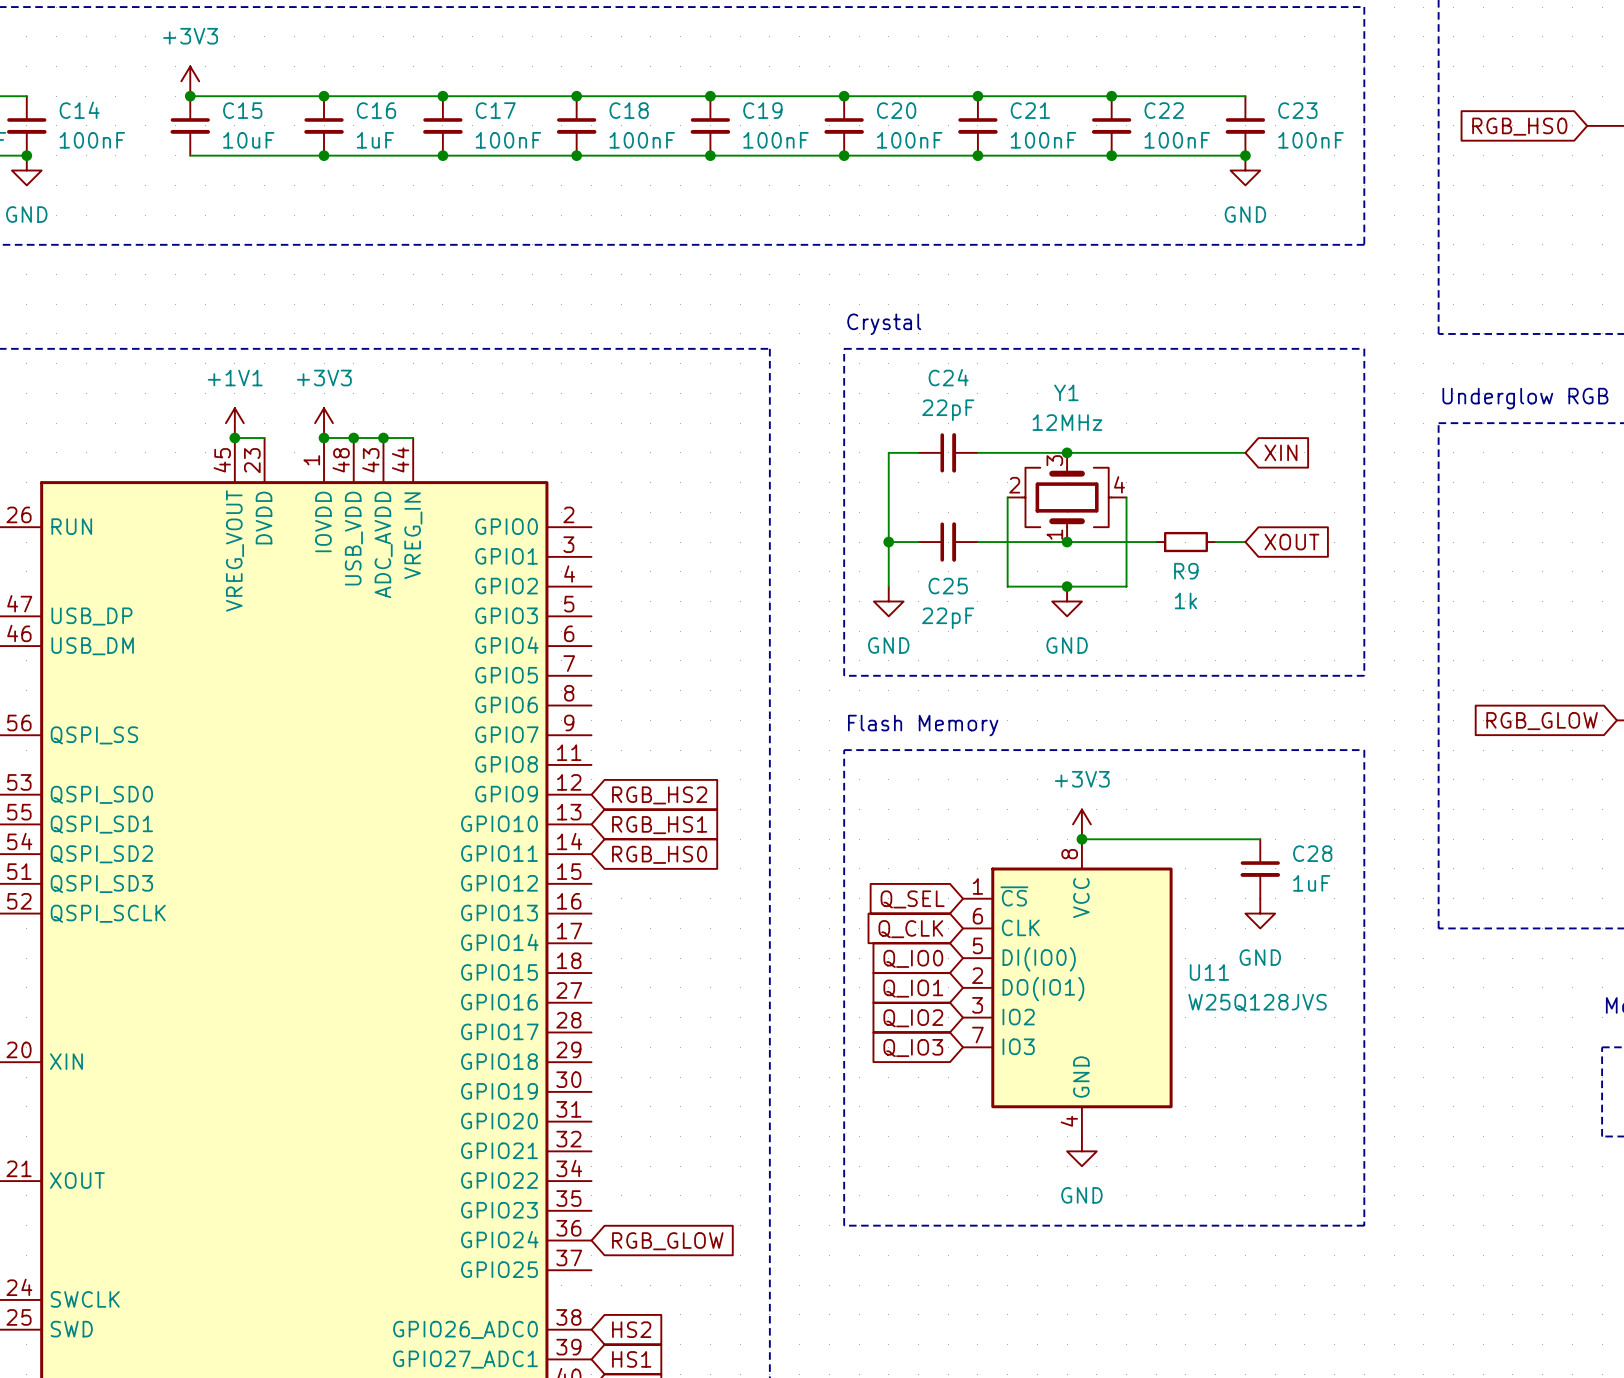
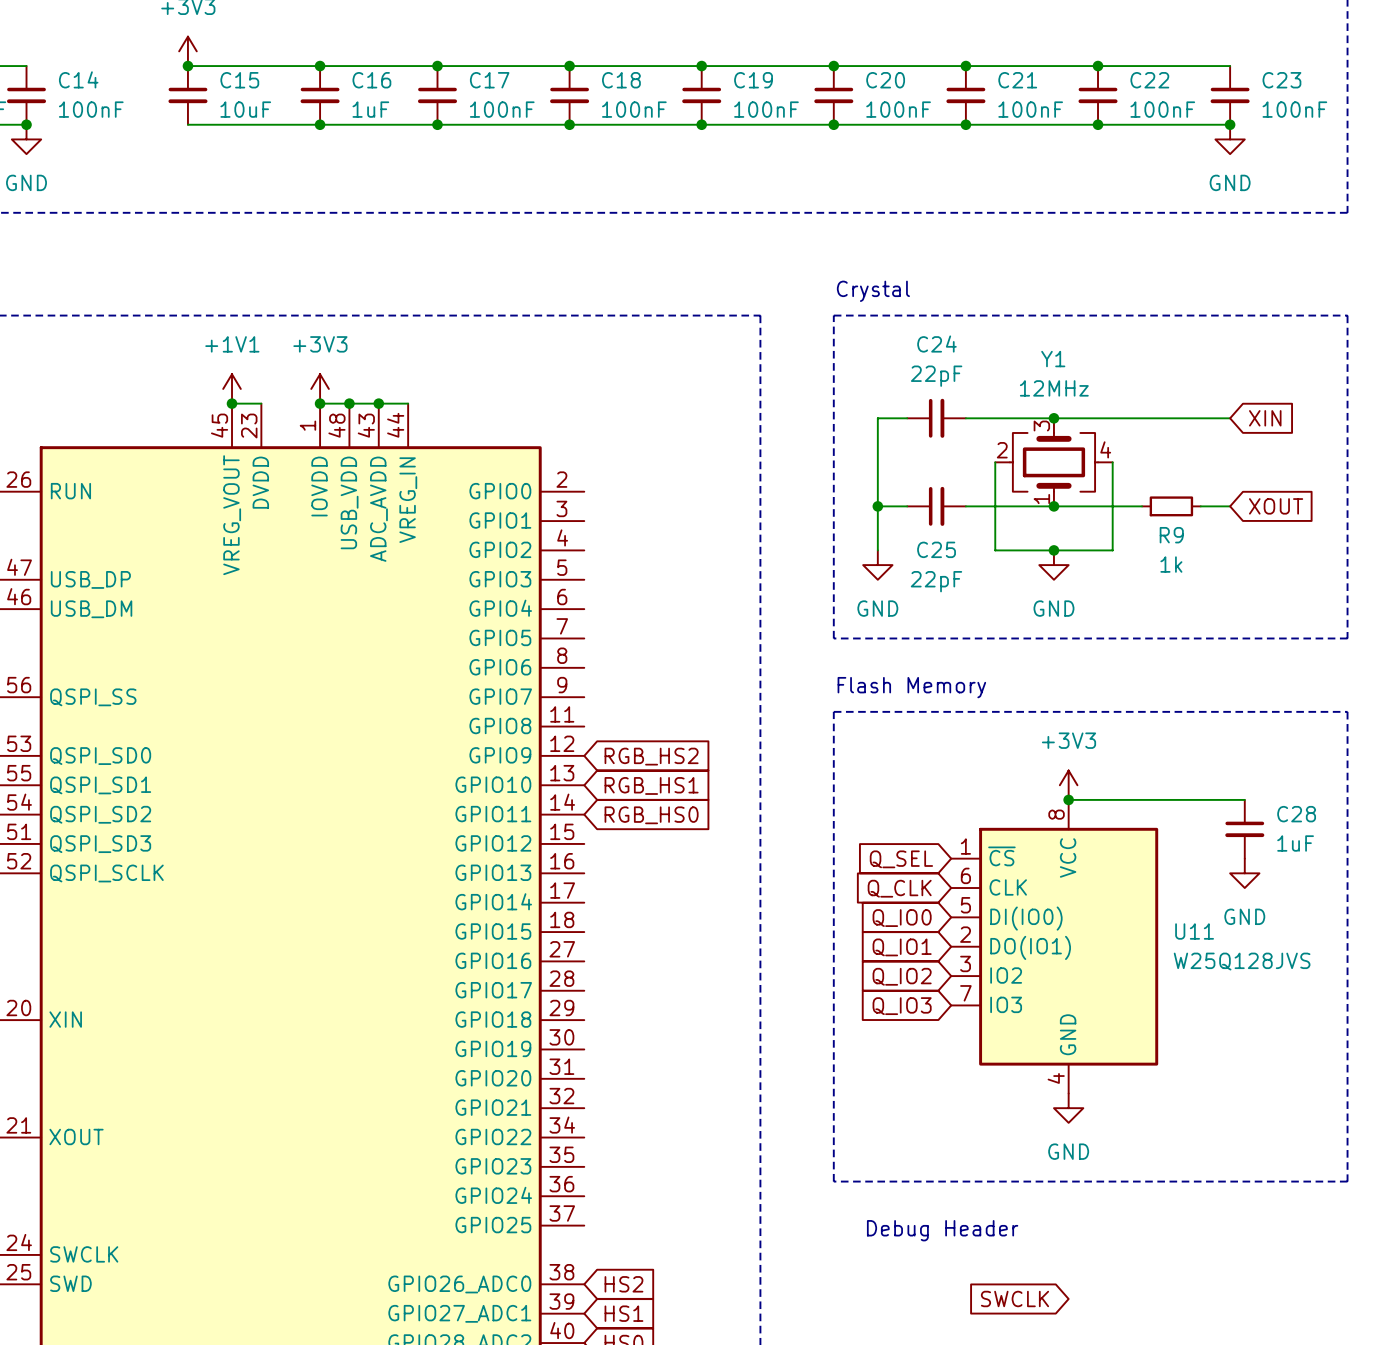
global label: RGB_GLOW (667, 1241) -> none
text: none -> Debug Header (942, 1230)
global label: none -> SWCLK (1014, 1298)

